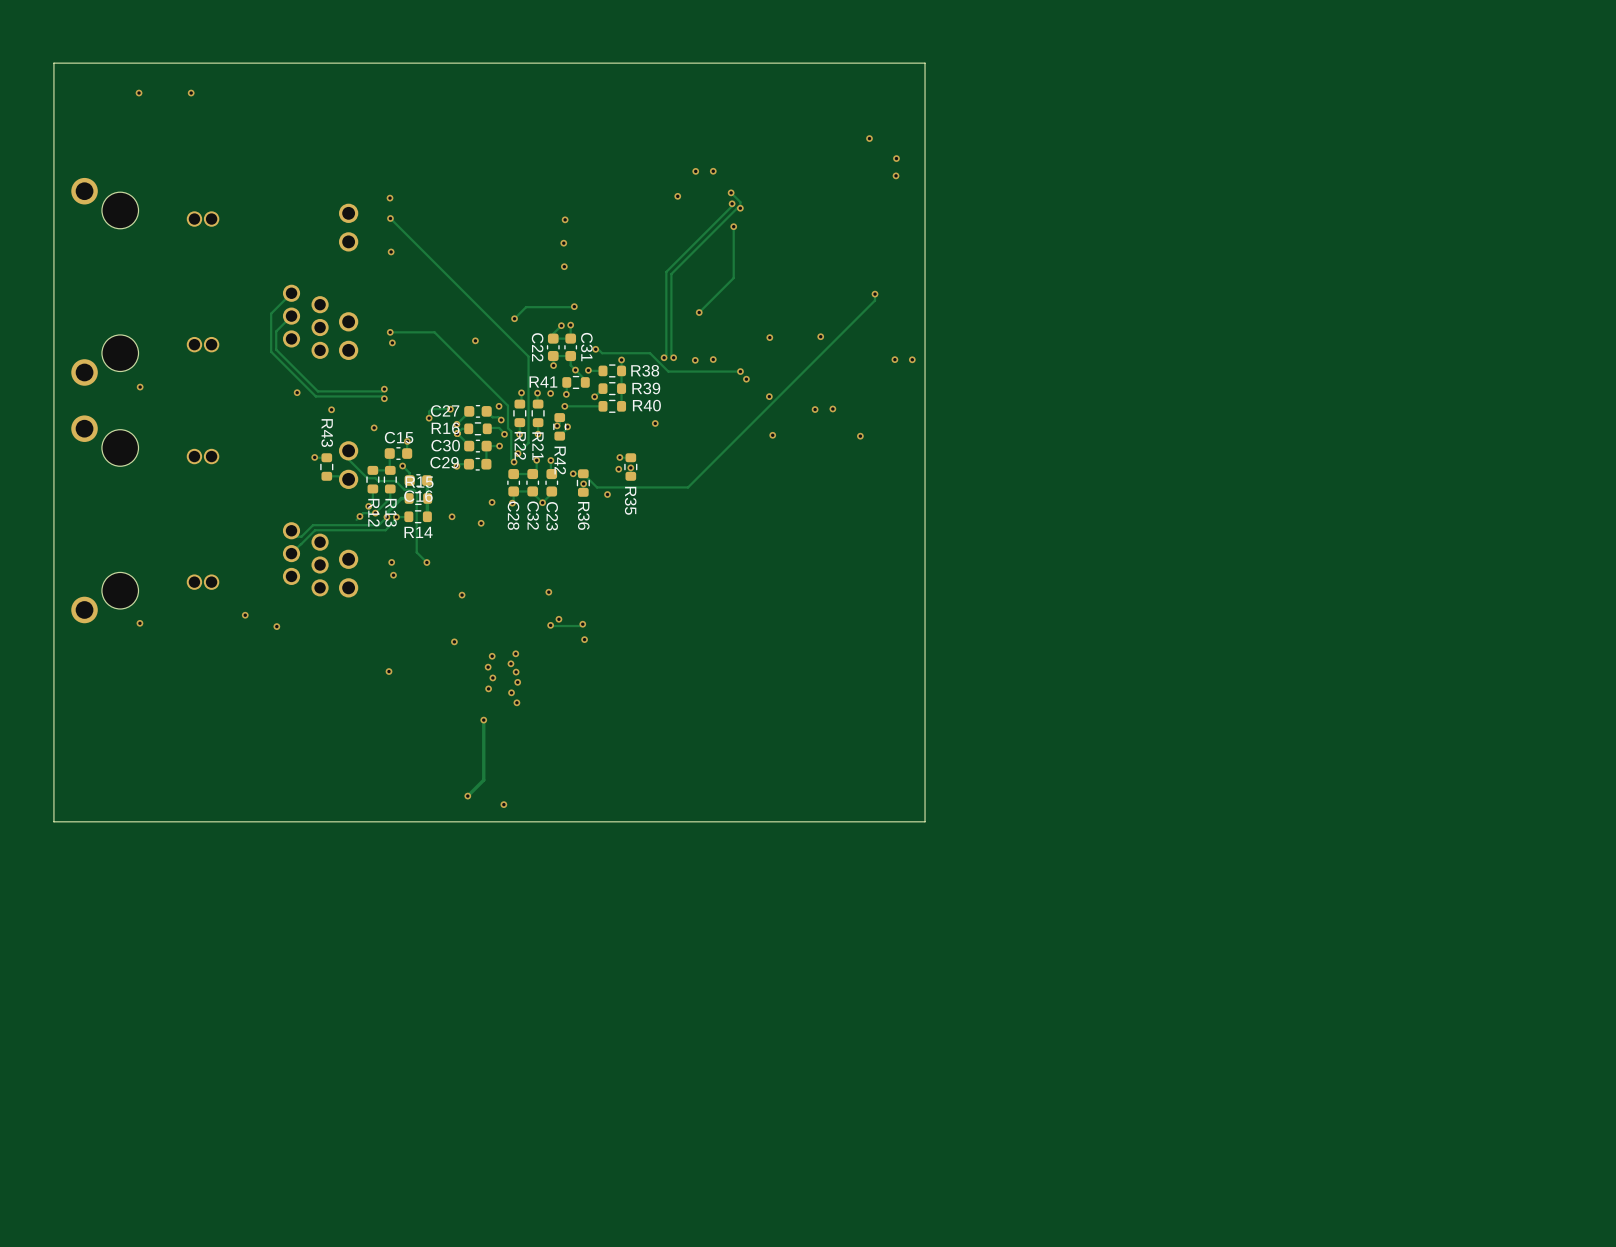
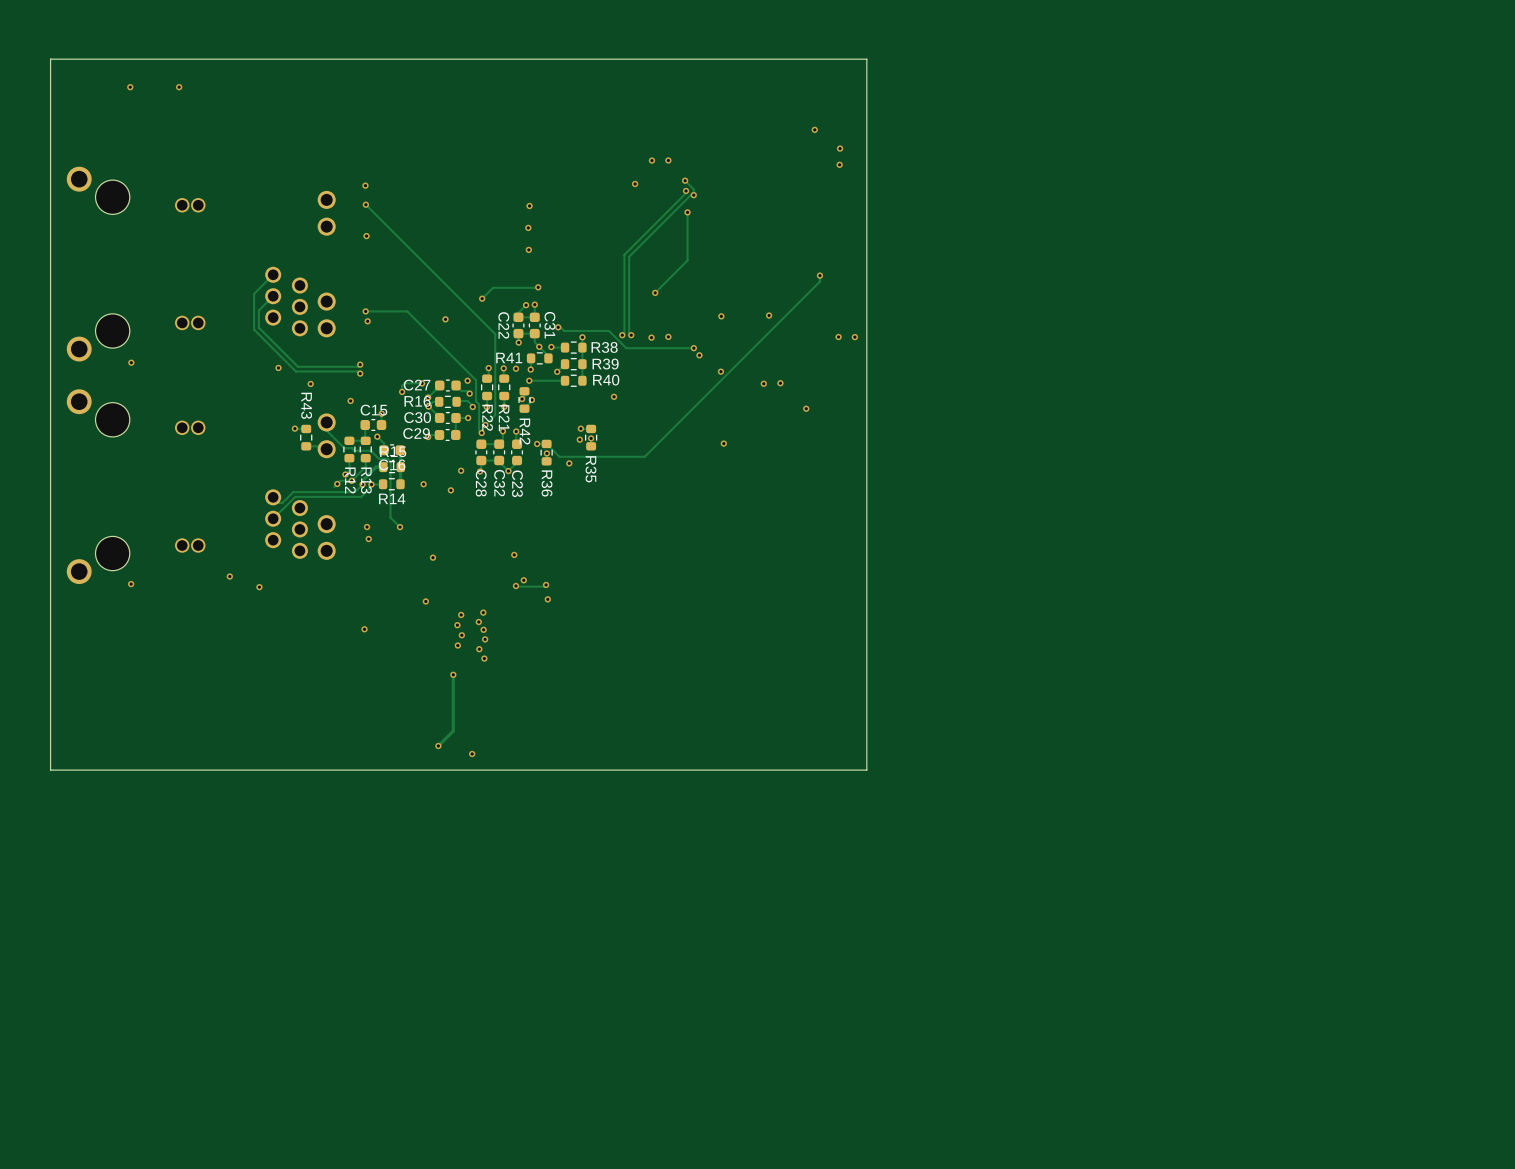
via position: (772, 435) -> (723, 443)

